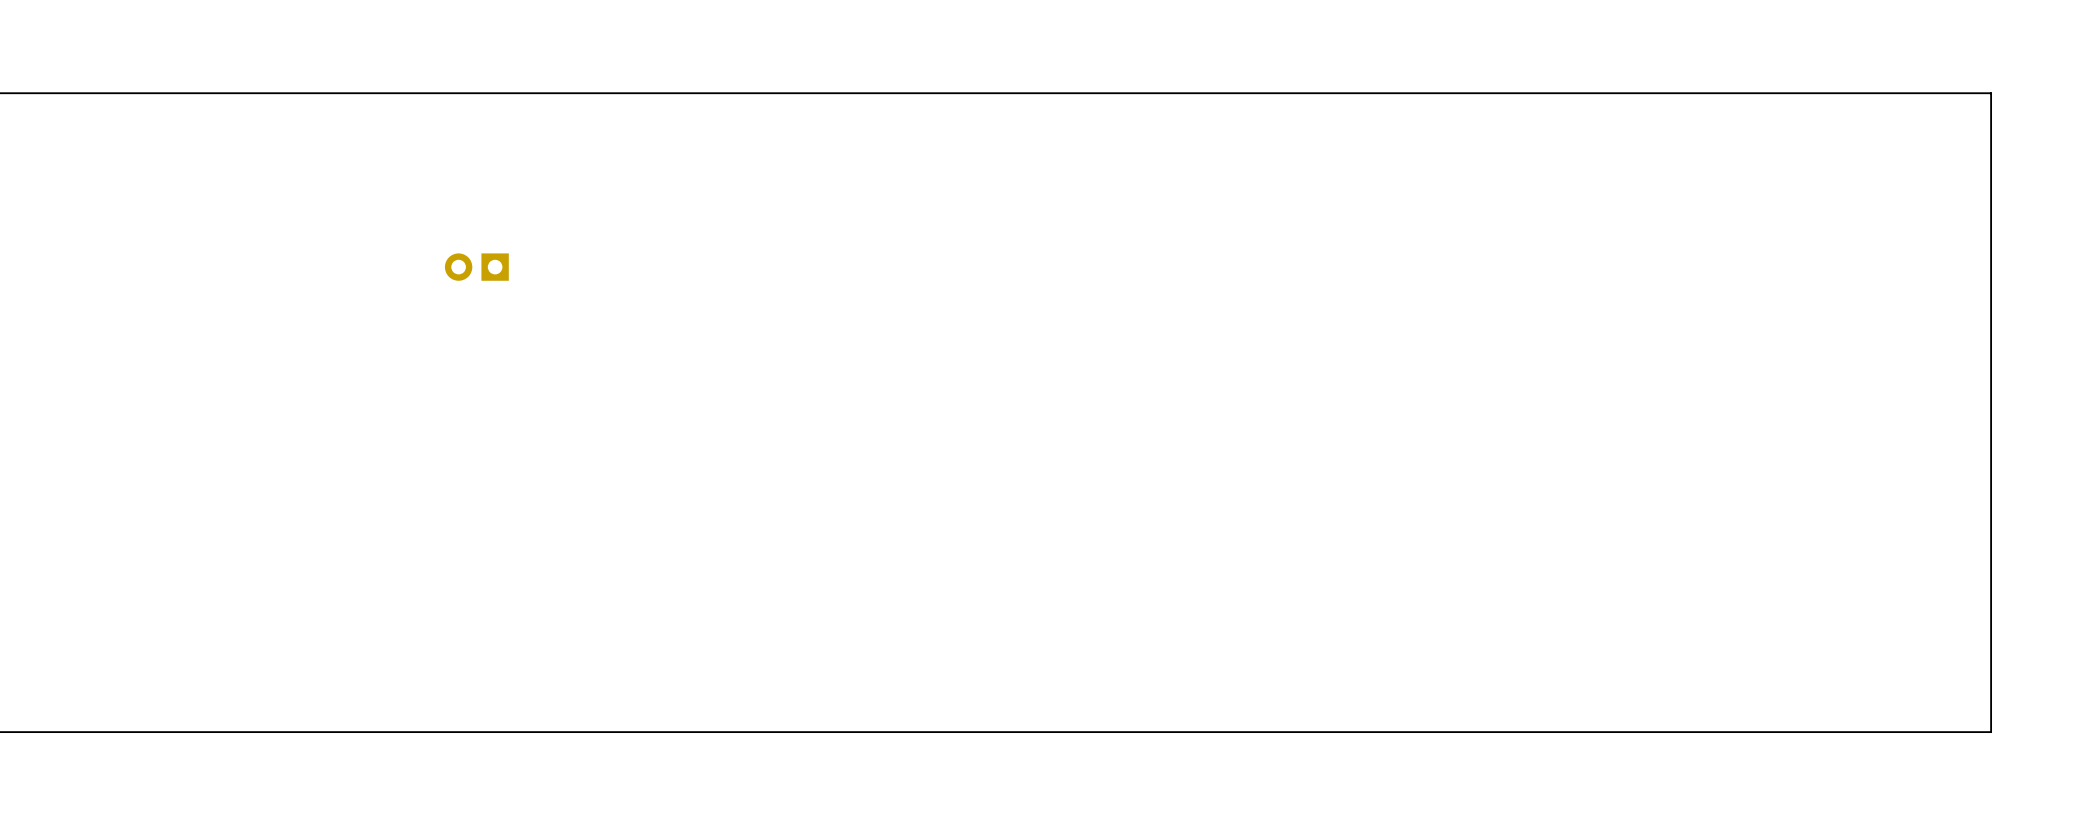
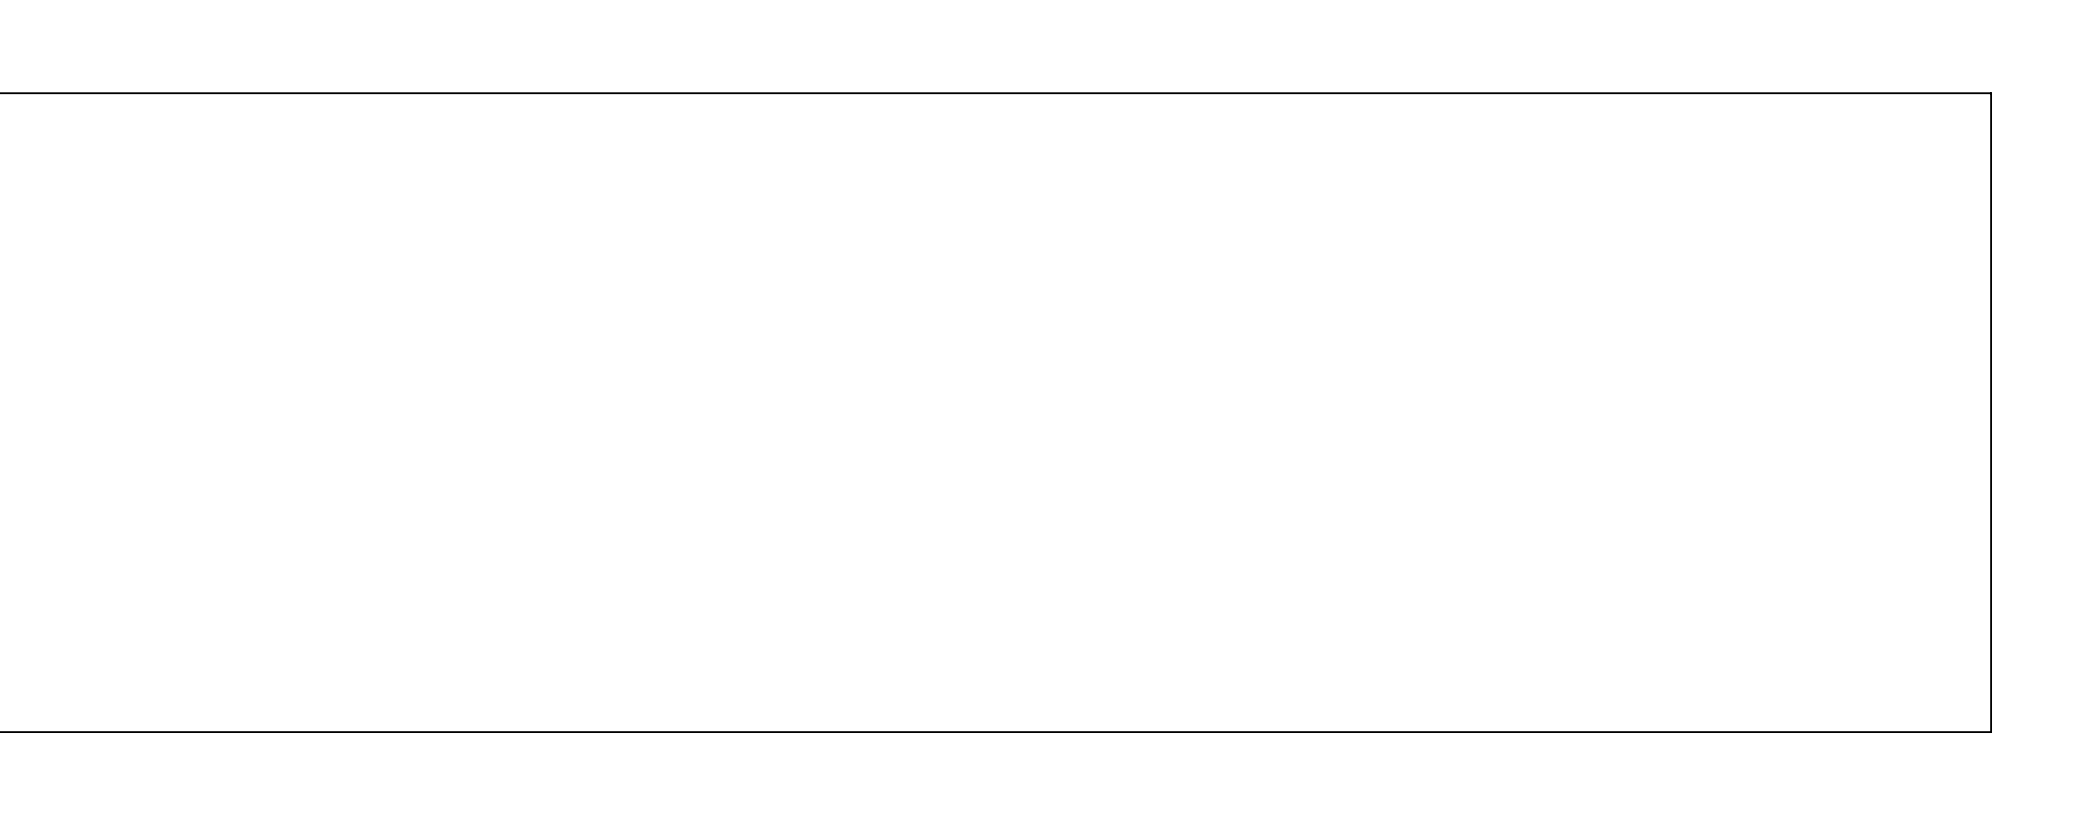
part: (476, 267) -> none

